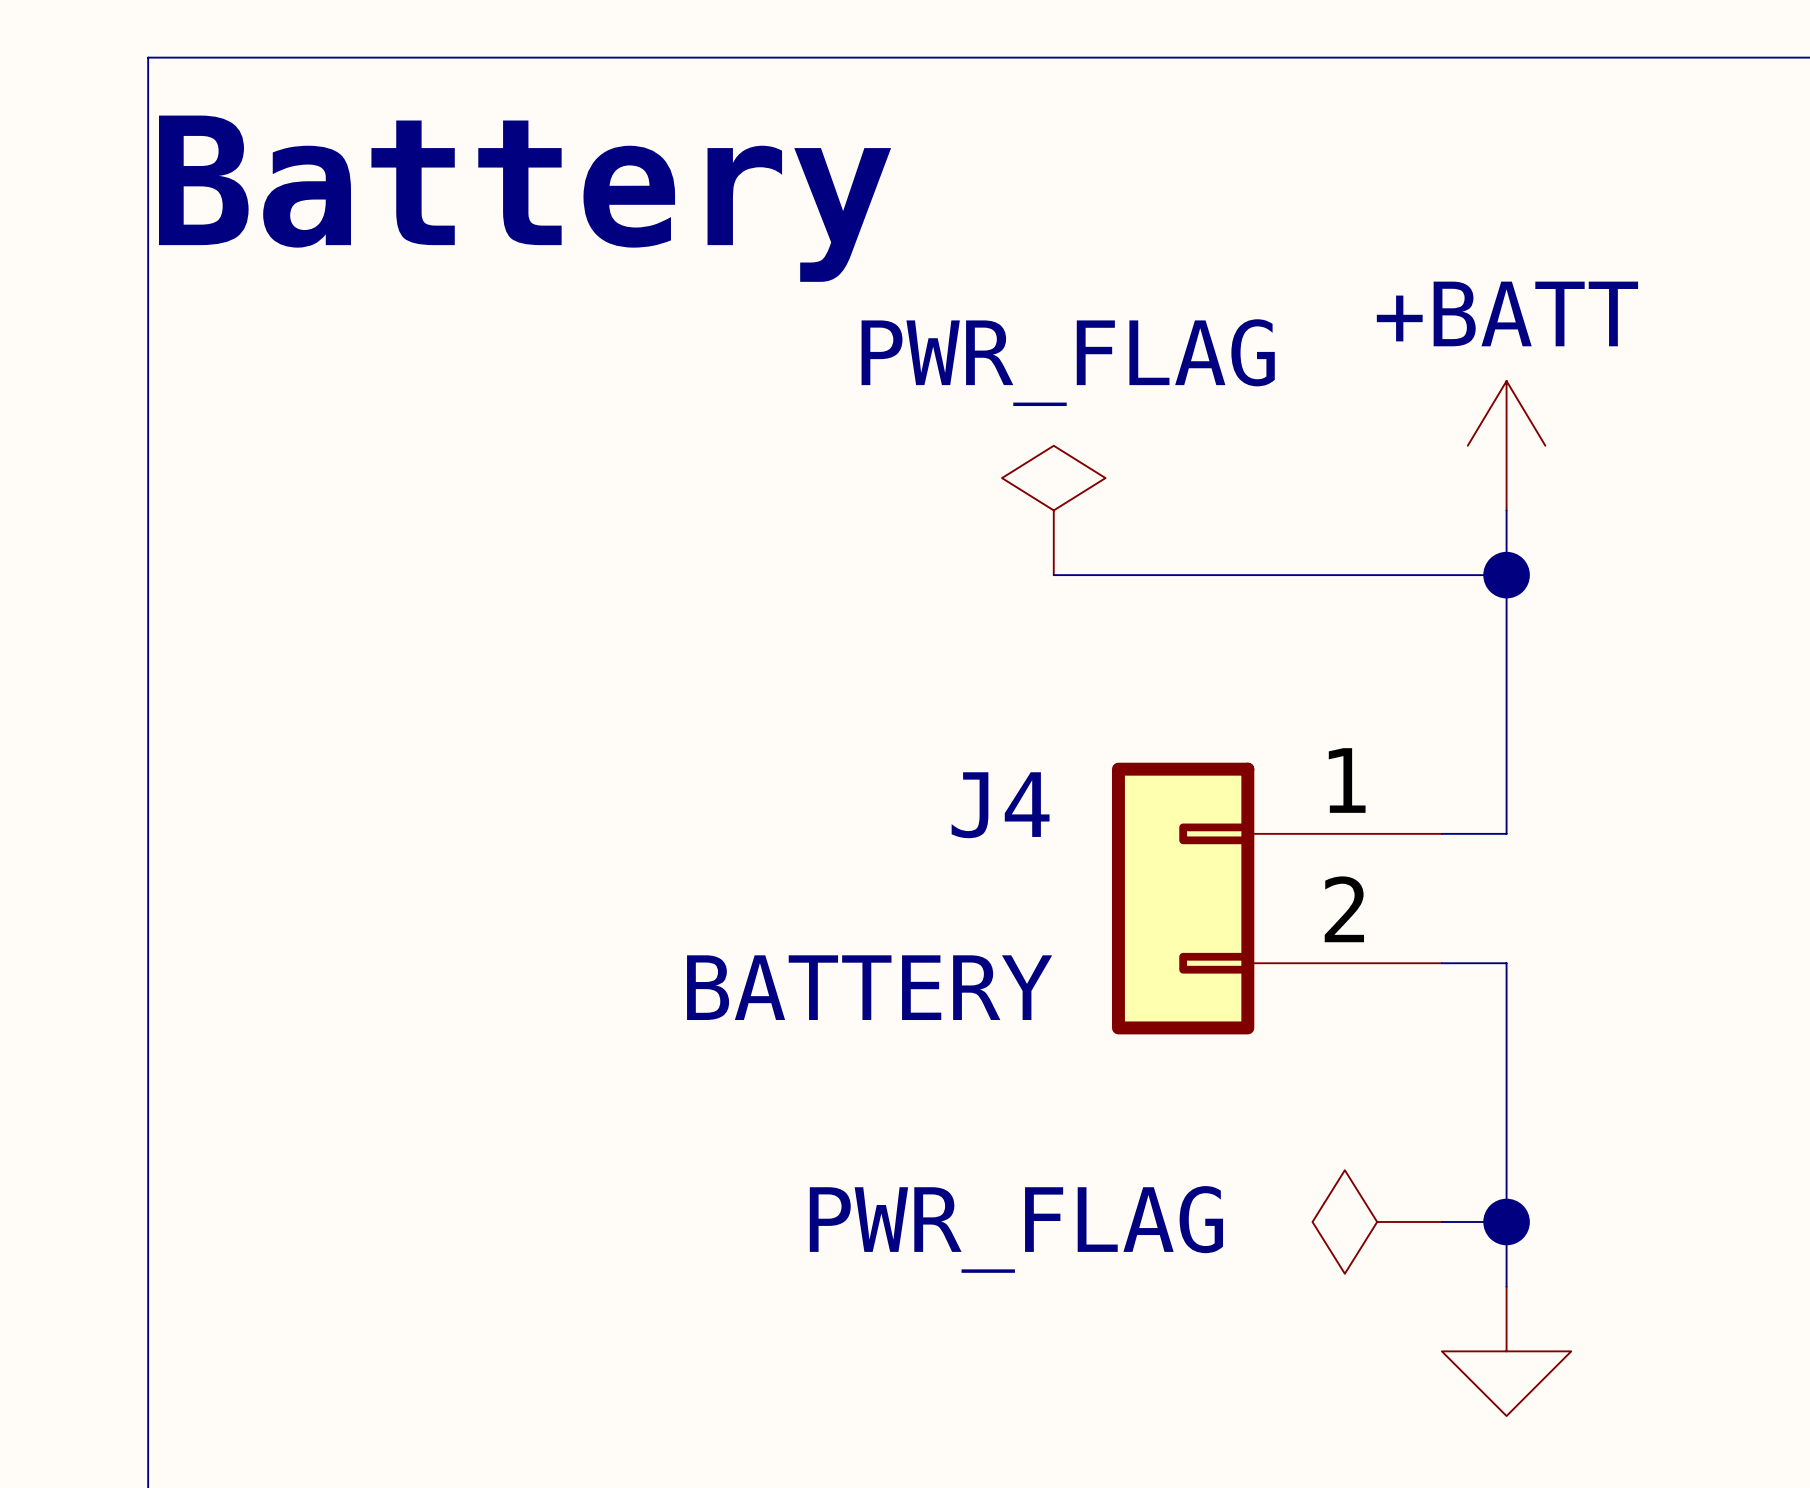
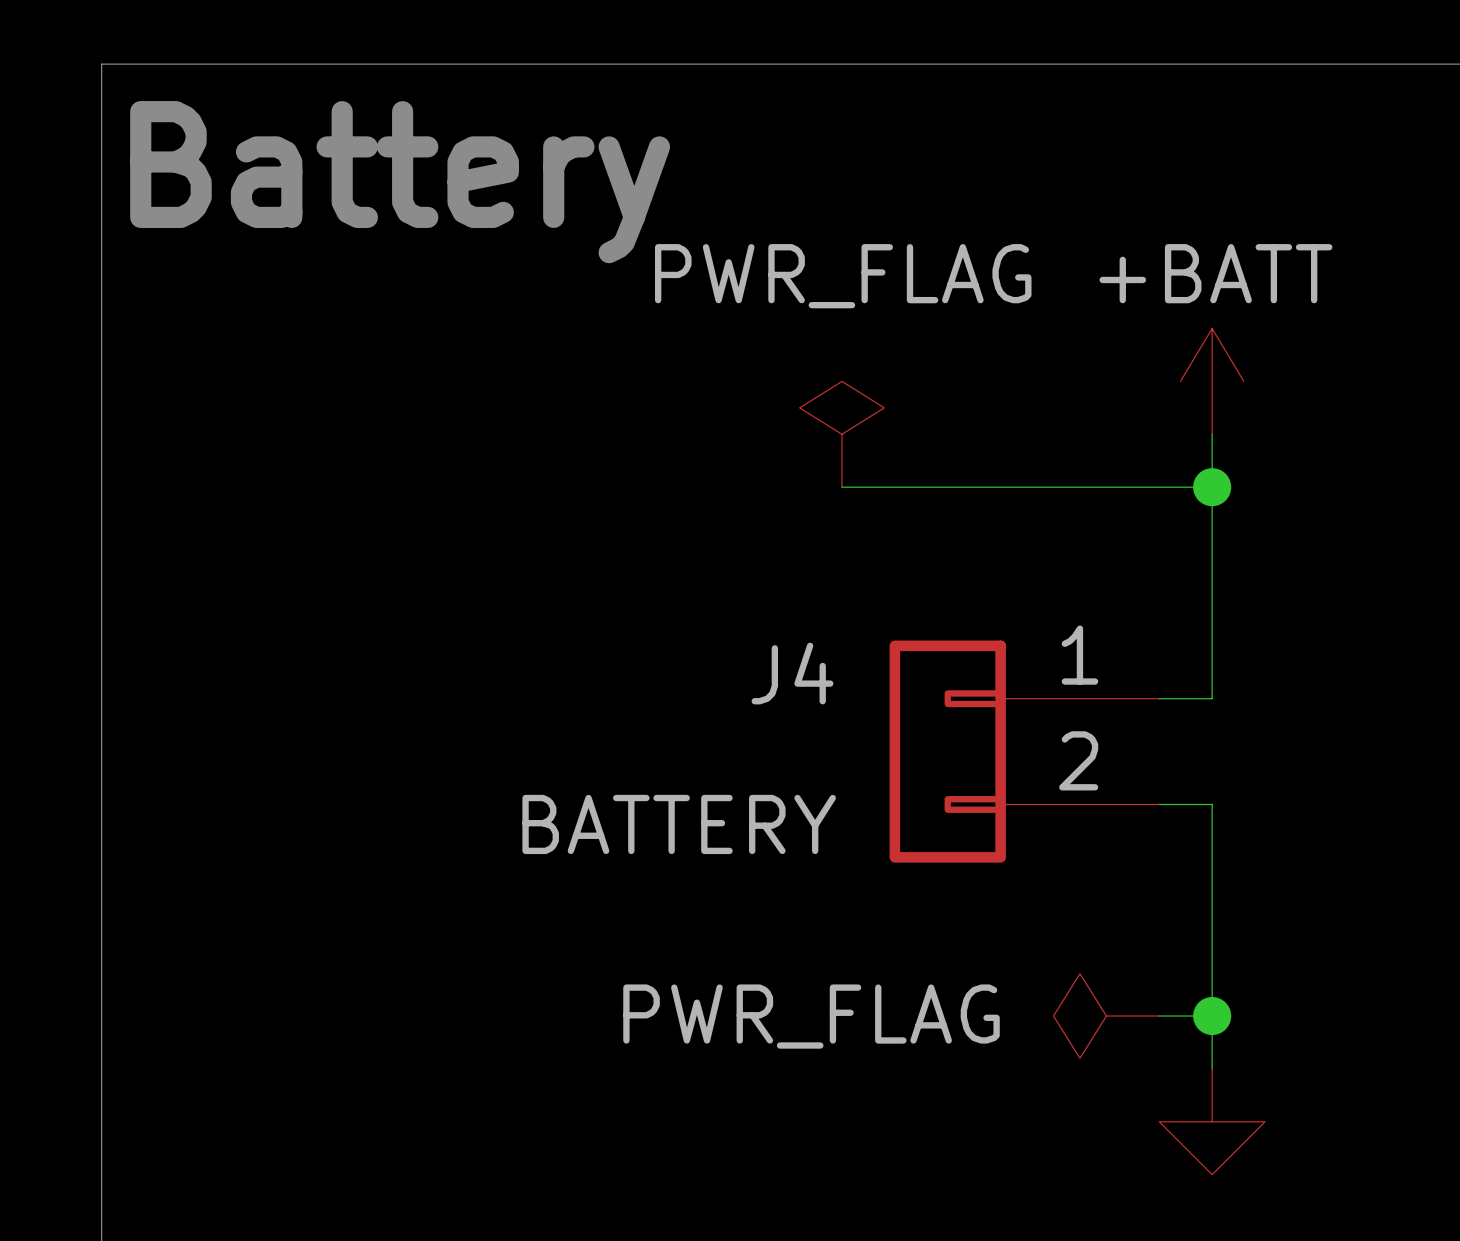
power symbol text position: PWR_FLAG (1068, 362) -> PWR_FLAG (843, 276)

